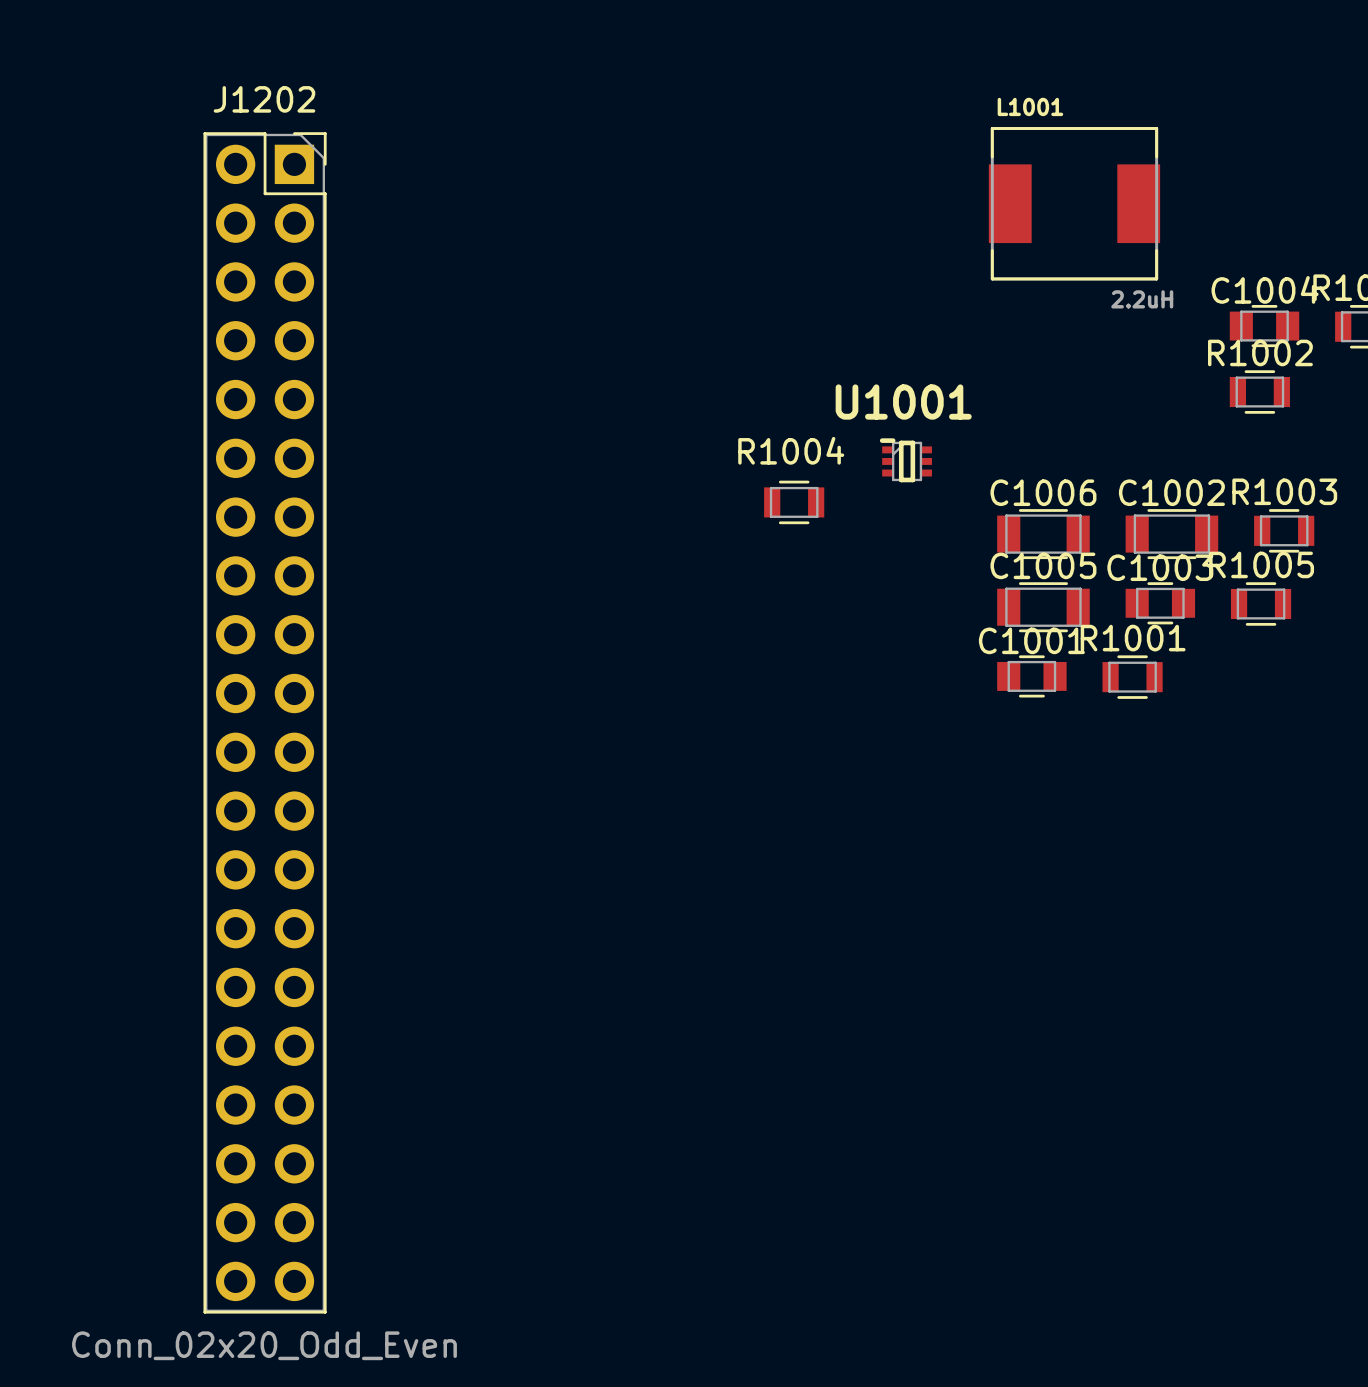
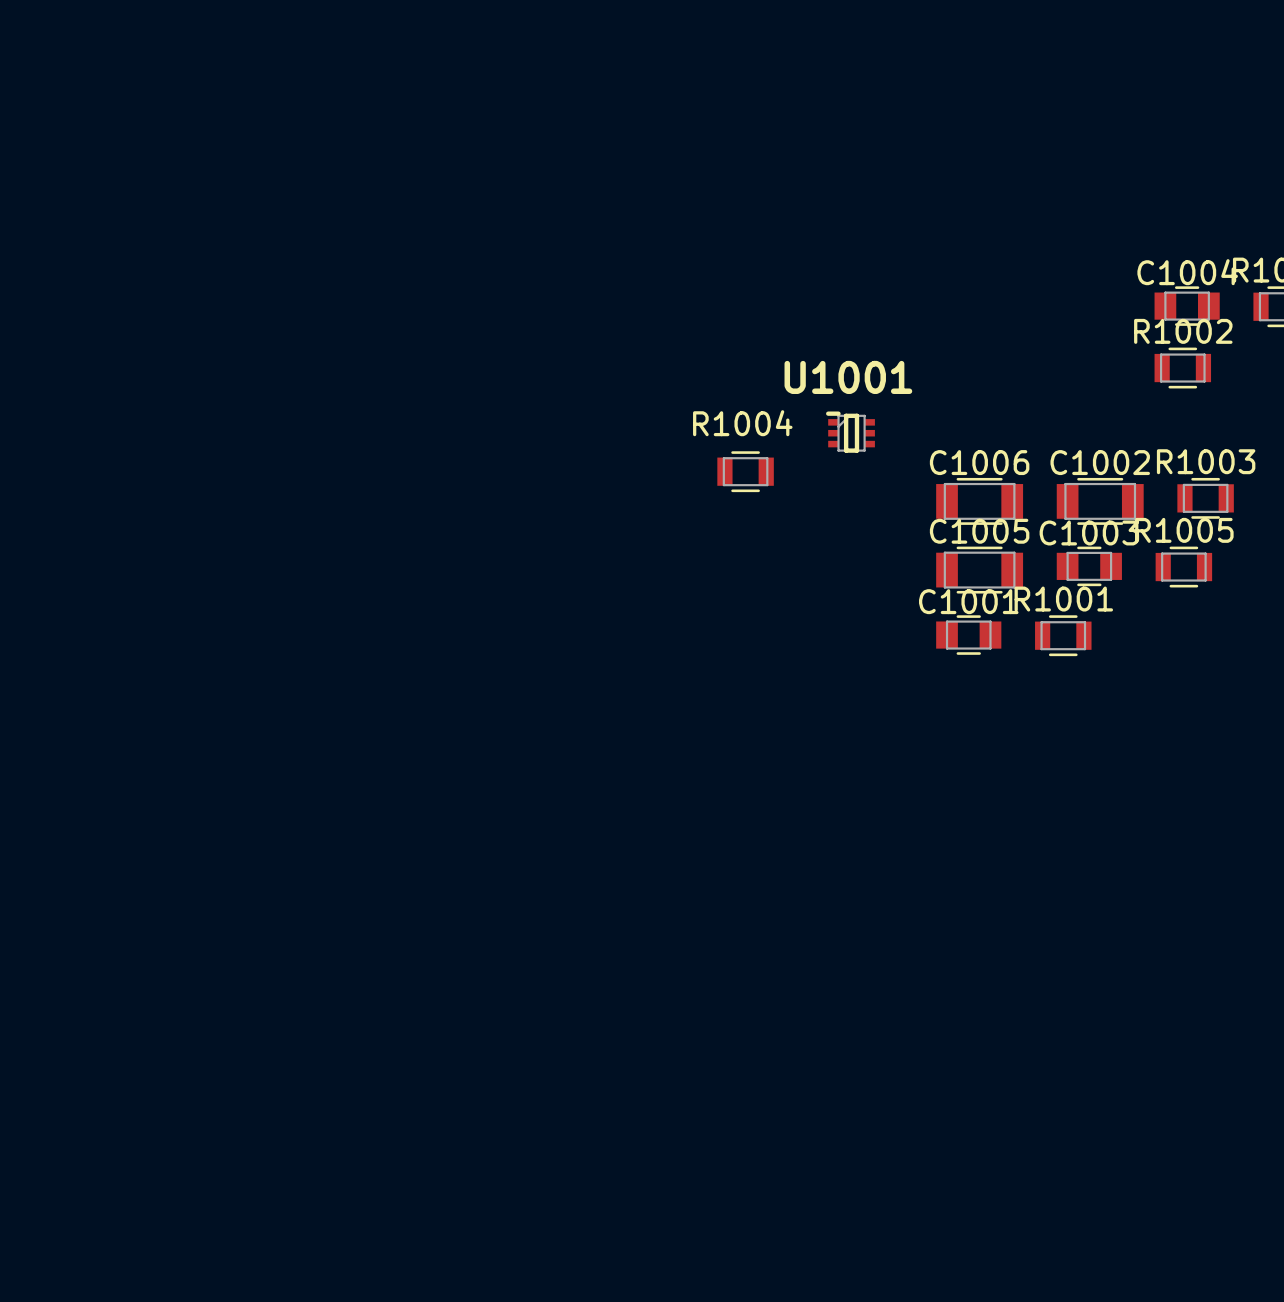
L1001: 2.2uH (1074, 203) -> none
J1202: Conn_02x20_Odd_Even (265, 722) -> none

